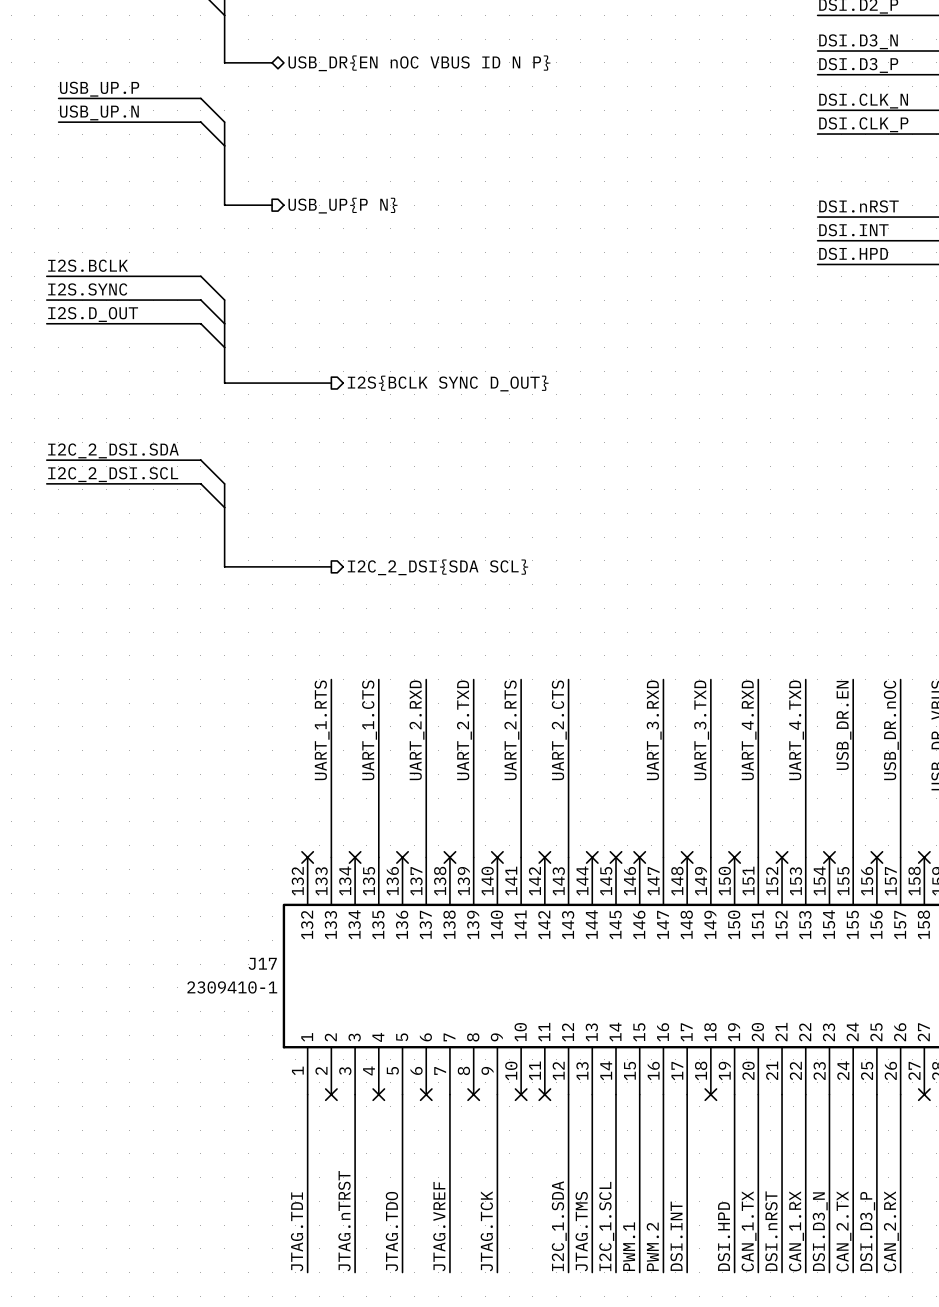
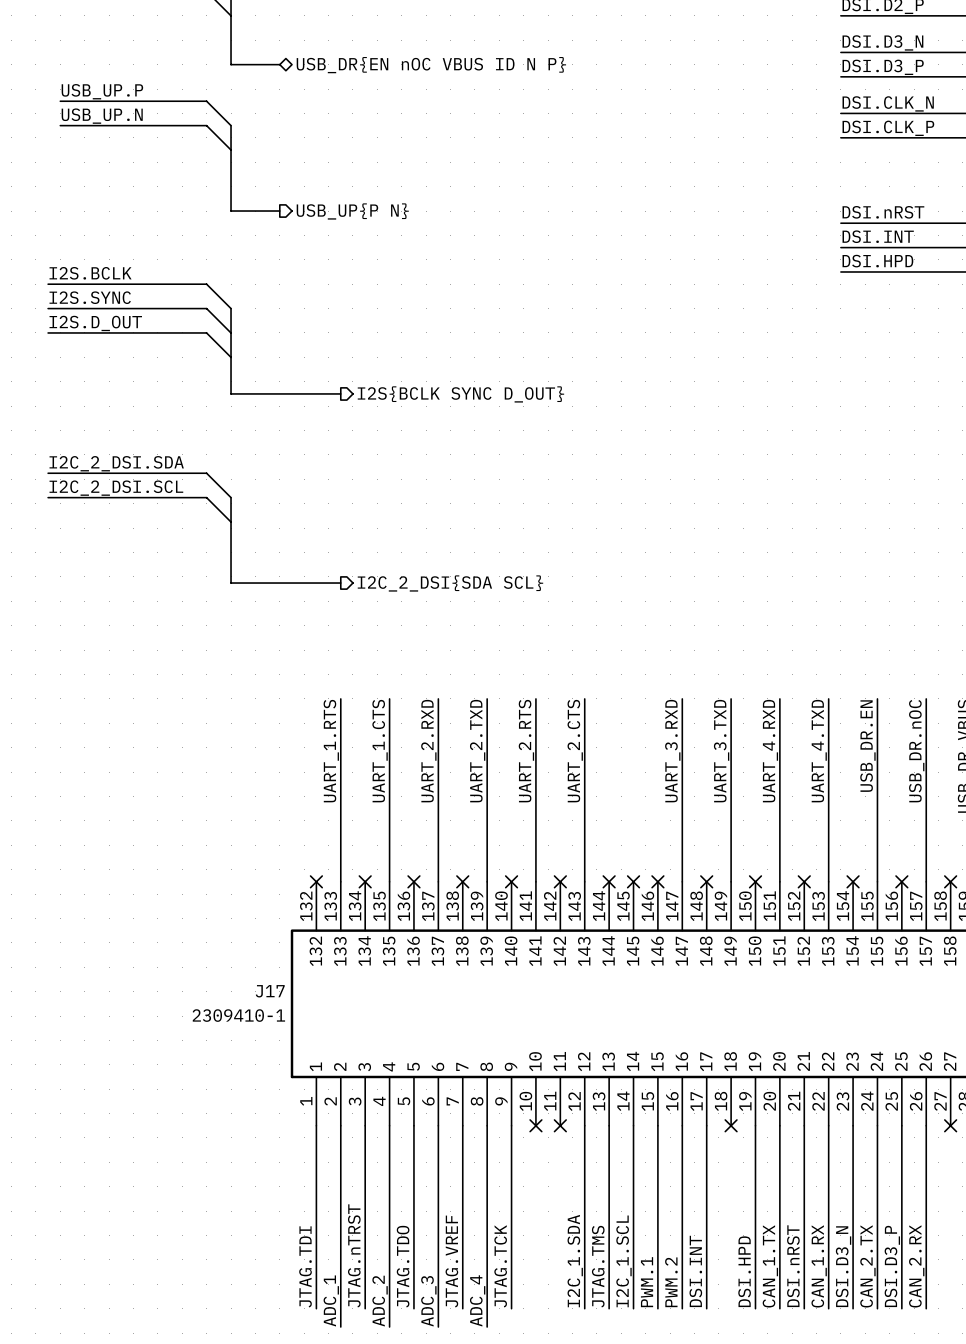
wire: none -> (340, 1125) (340, 1327)
no-connect mark: (331, 1094) -> none
wire: none -> (389, 1125) (389, 1327)
no-connect mark: (378, 1094) -> none
wire: none -> (438, 1125) (438, 1327)
no-connect mark: (426, 1094) -> none
wire: none -> (487, 1125) (487, 1327)
no-connect mark: (473, 1094) -> none
label: none -> ADC_1 (331, 1300)
label: none -> ADC_4 (477, 1300)
label: none -> ADC_2 (380, 1301)
label: none -> ADC_3 (428, 1301)

